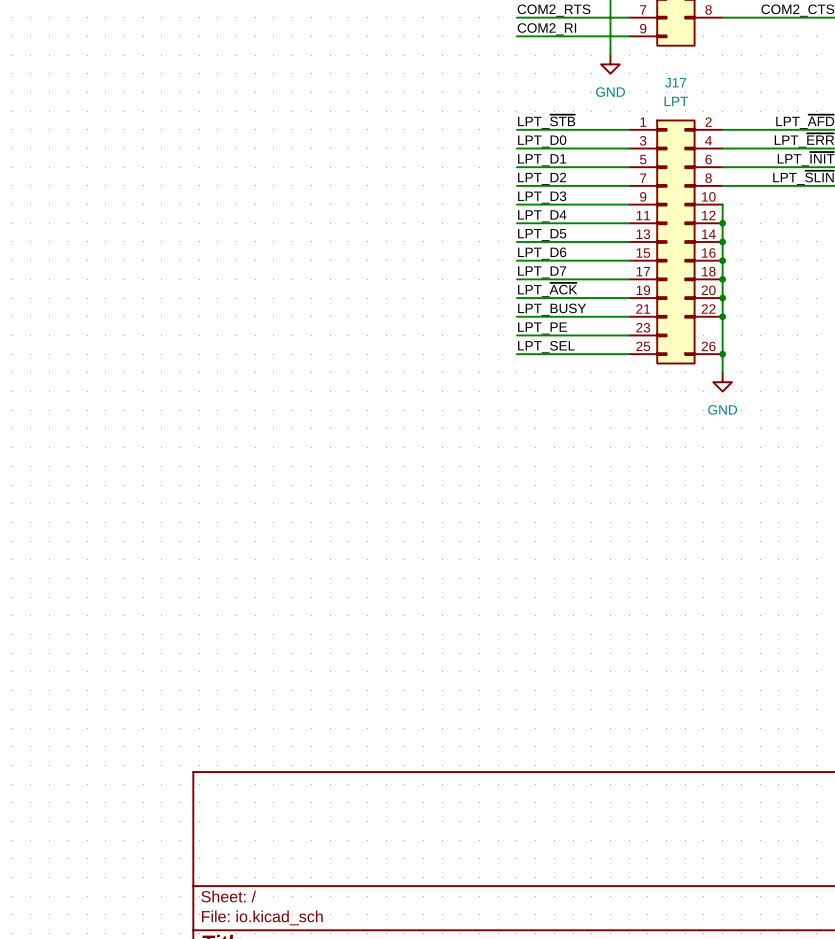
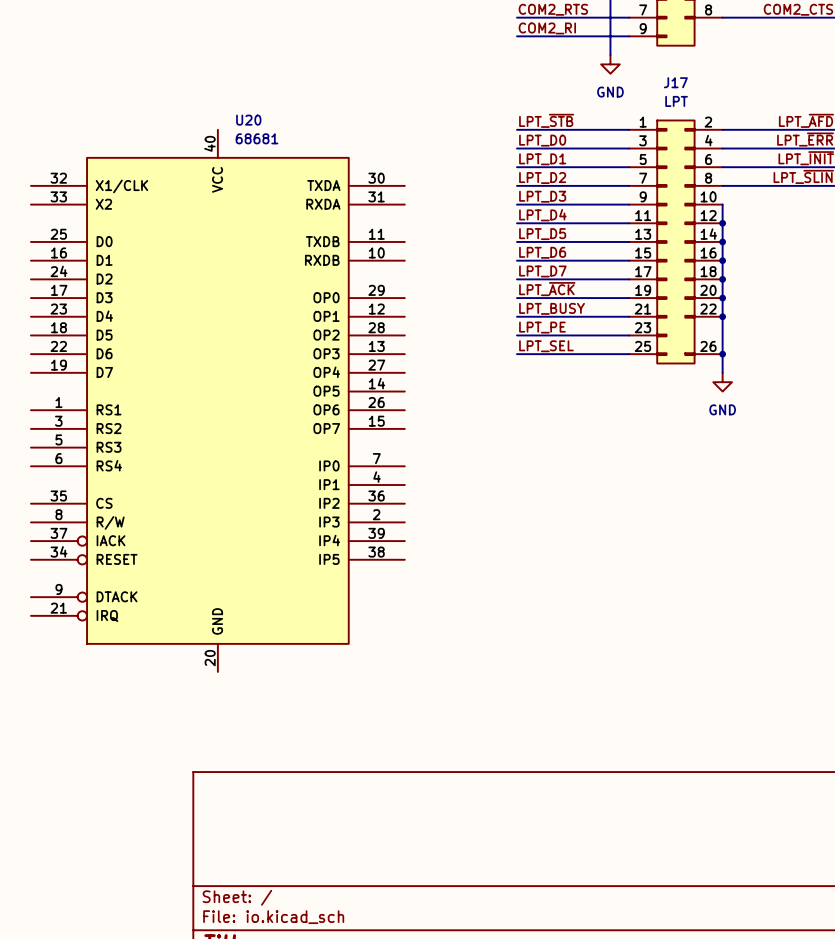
U20: none -> 68681 (217, 400)

